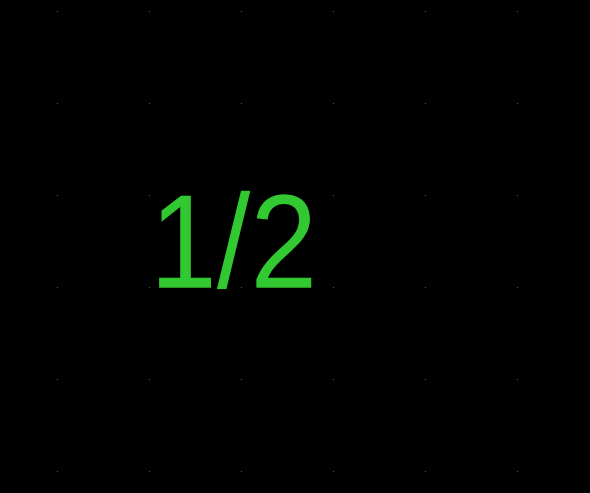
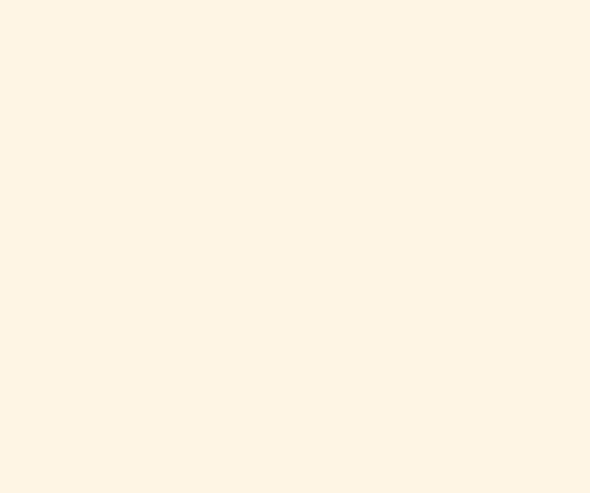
text: 1/2 (235, 239) -> none

